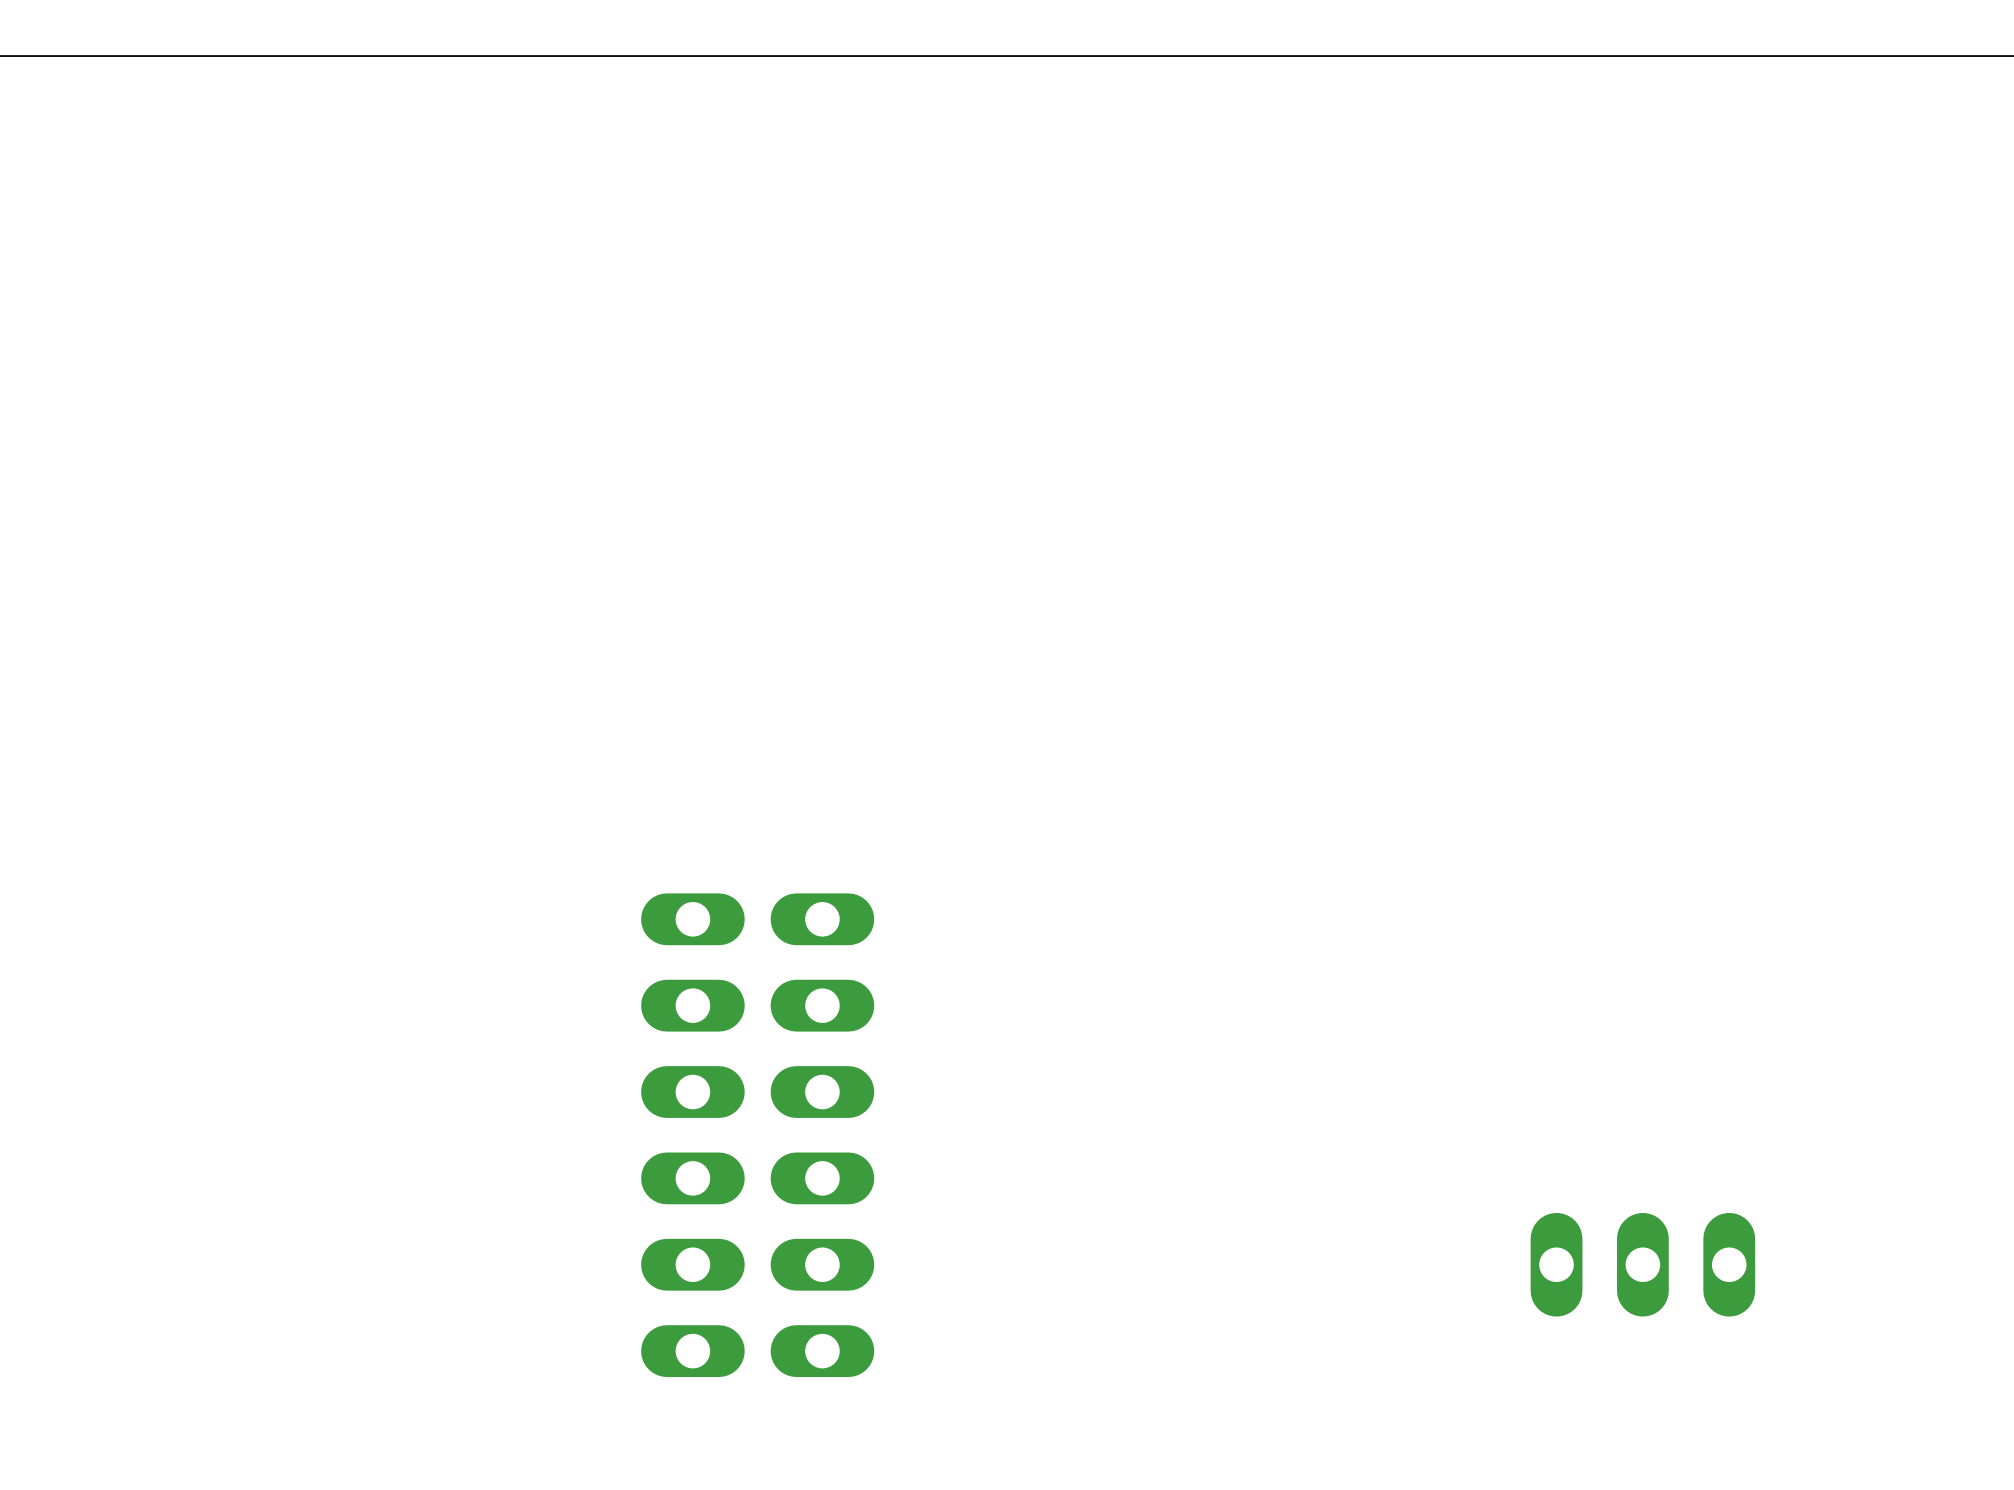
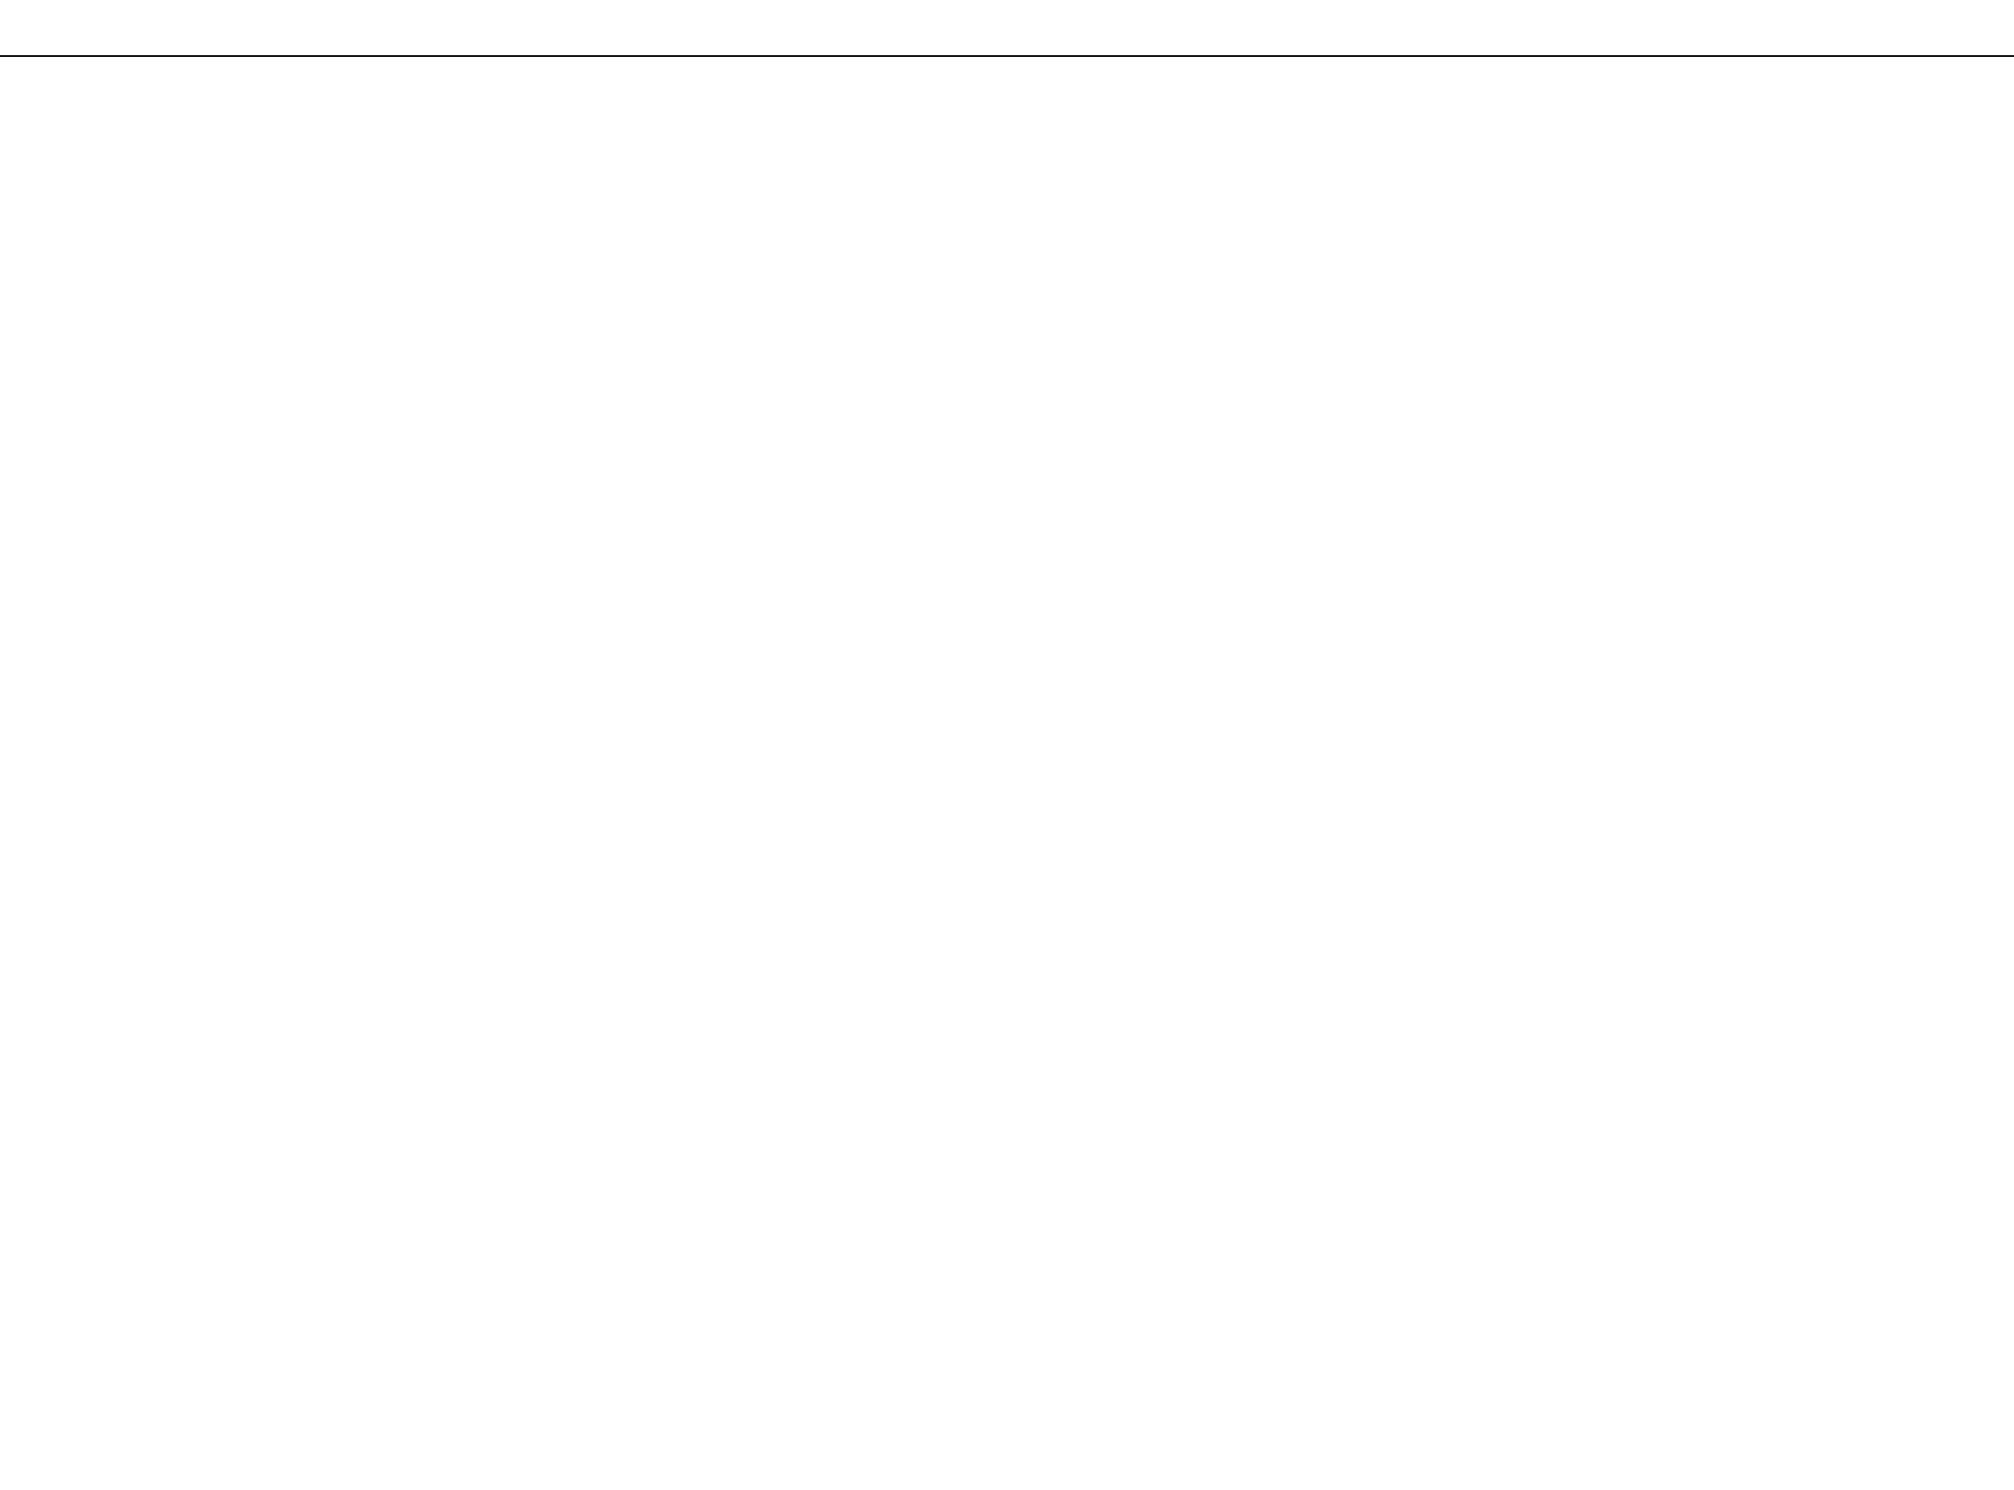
part: (692, 1135) -> none
part: (822, 1135) -> none
part: (1642, 1264) -> none

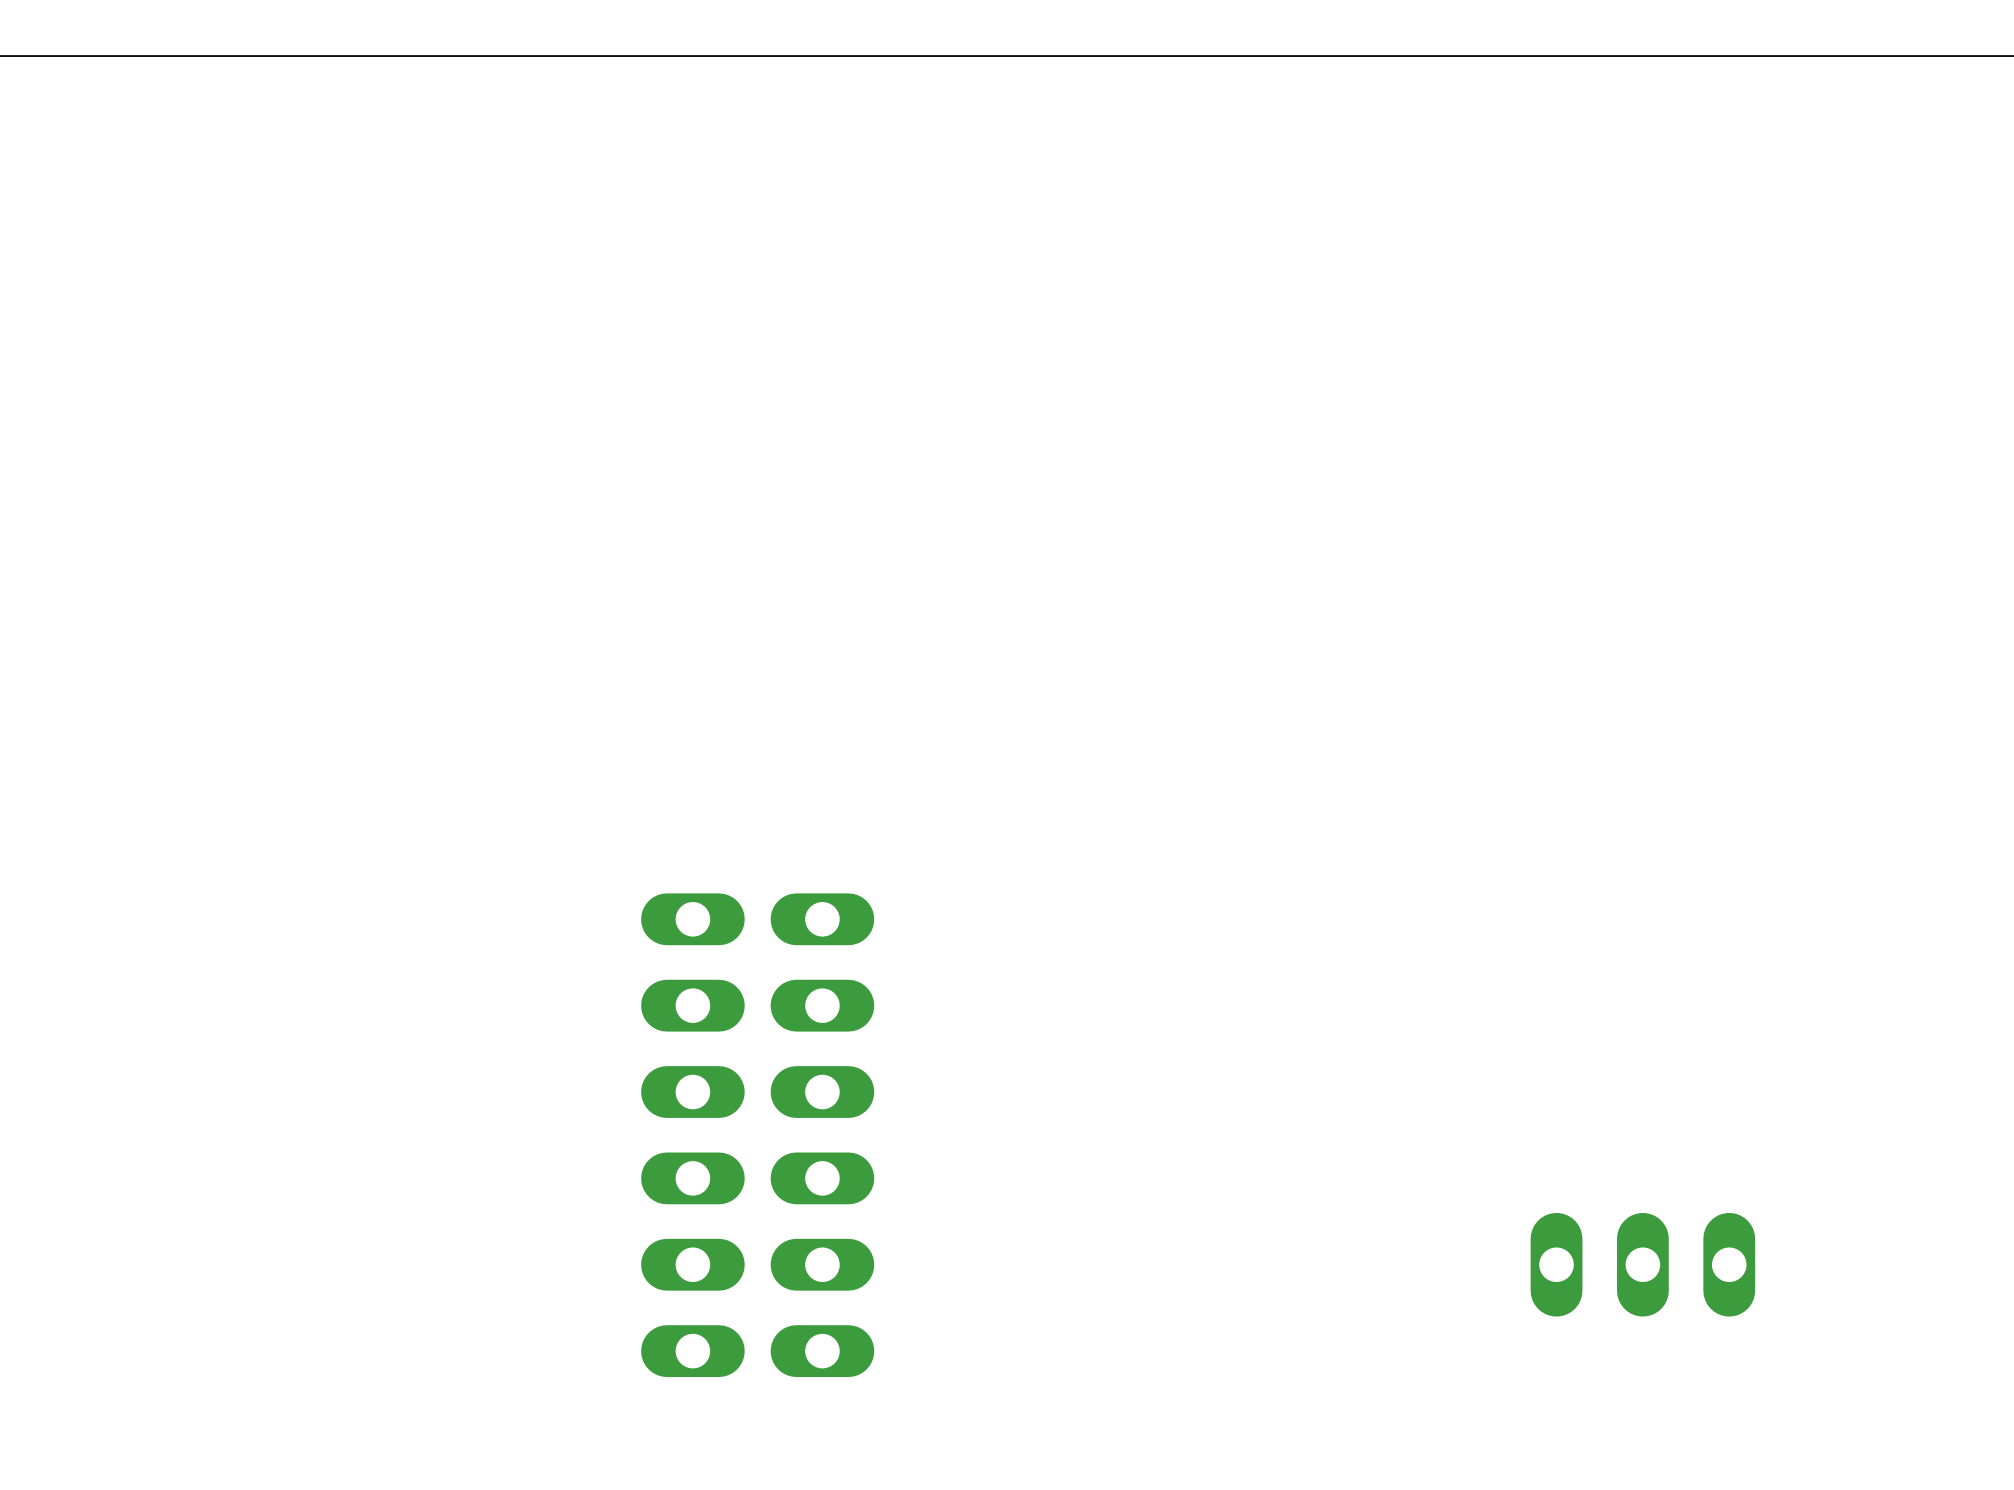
part: none -> (692, 1135)
part: none -> (822, 1135)
part: none -> (1642, 1264)

